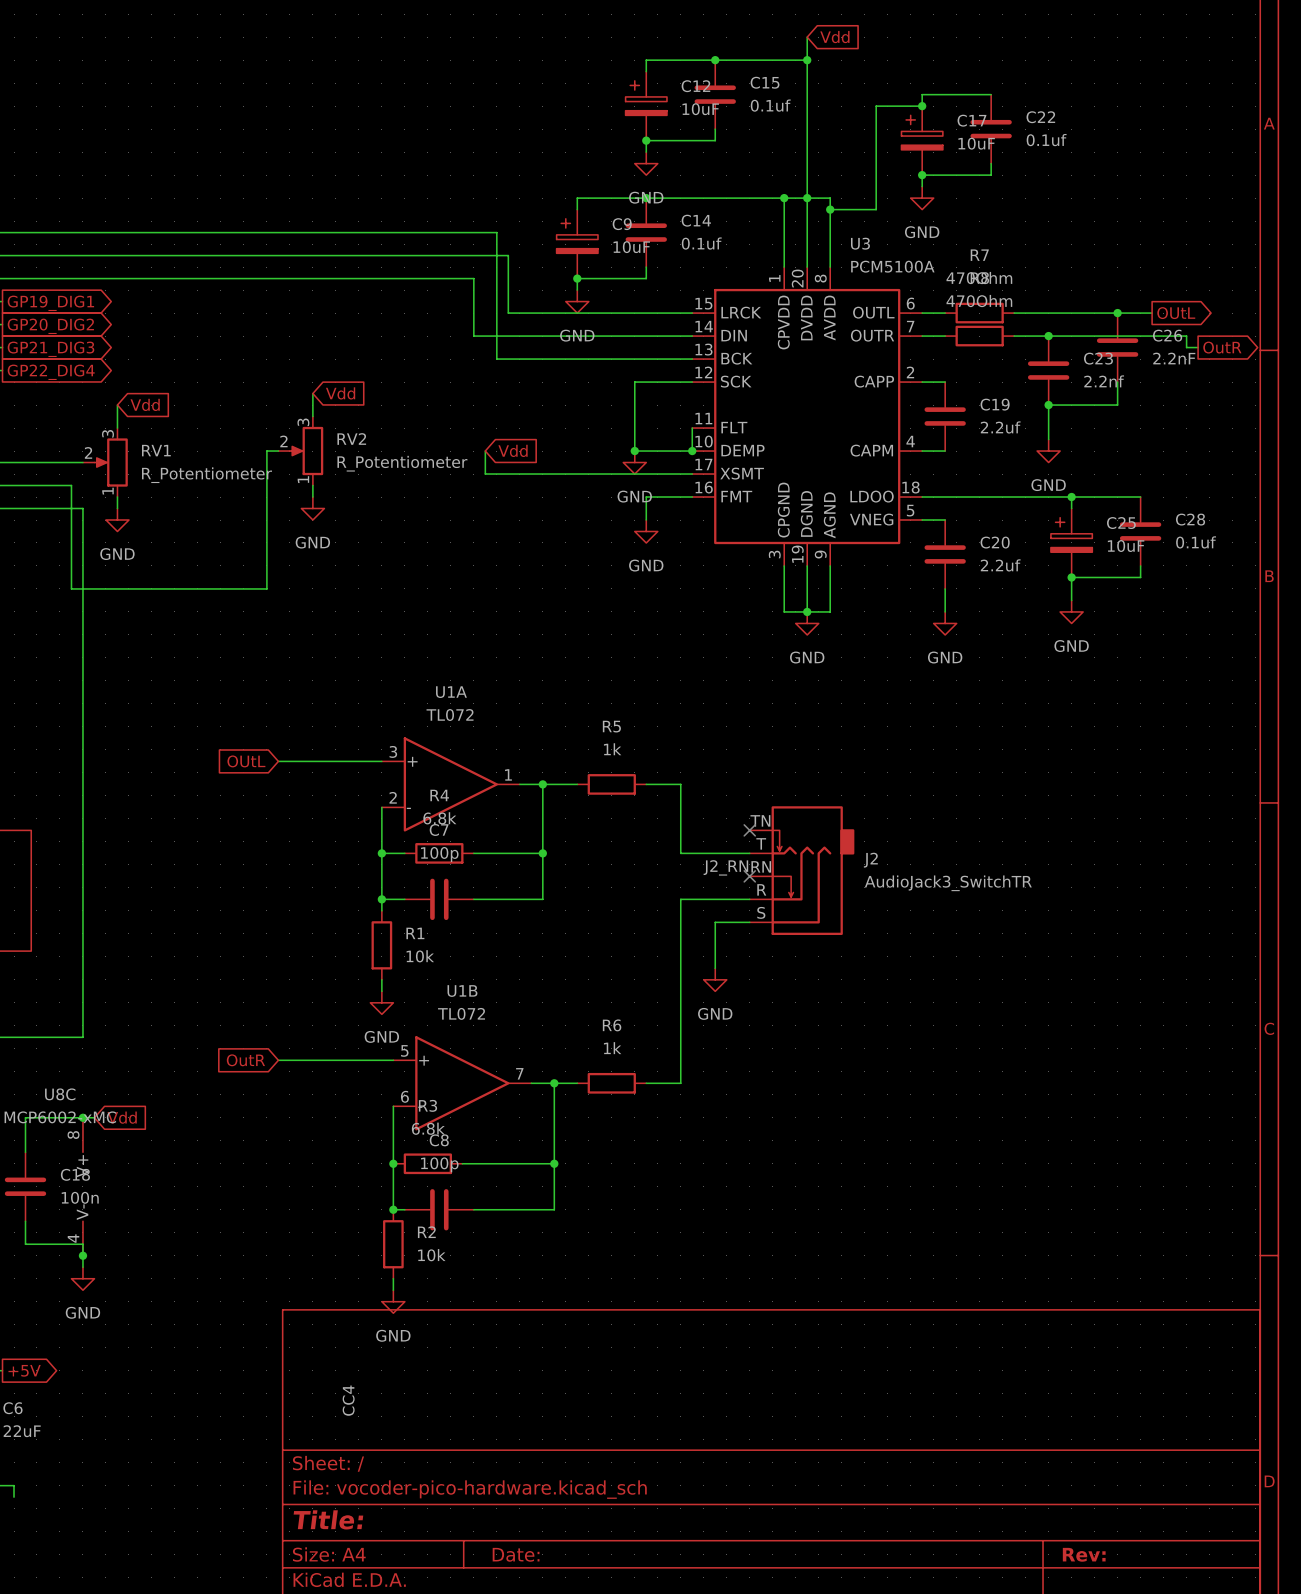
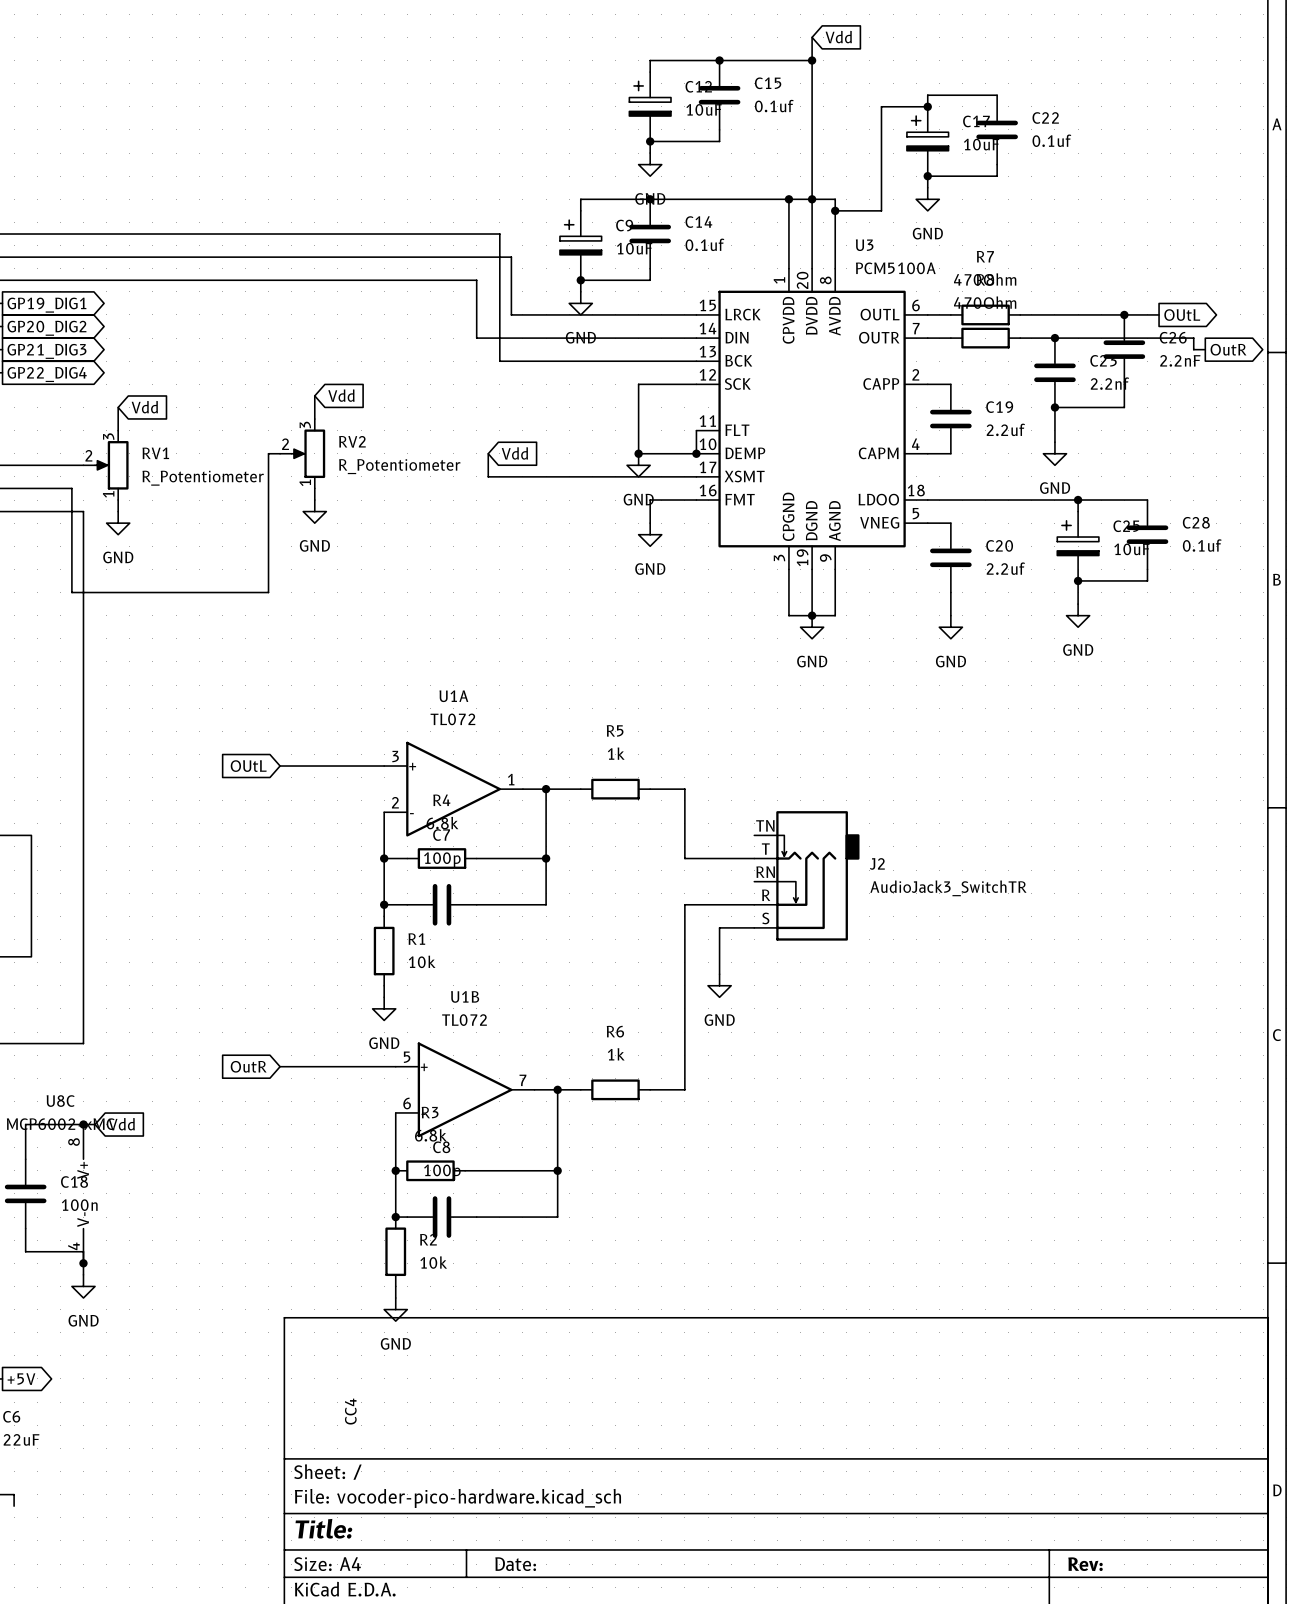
no-connect mark: (749, 830) -> none
label: J2_RN (725, 867) -> none
no-connect mark: (749, 876) -> none

